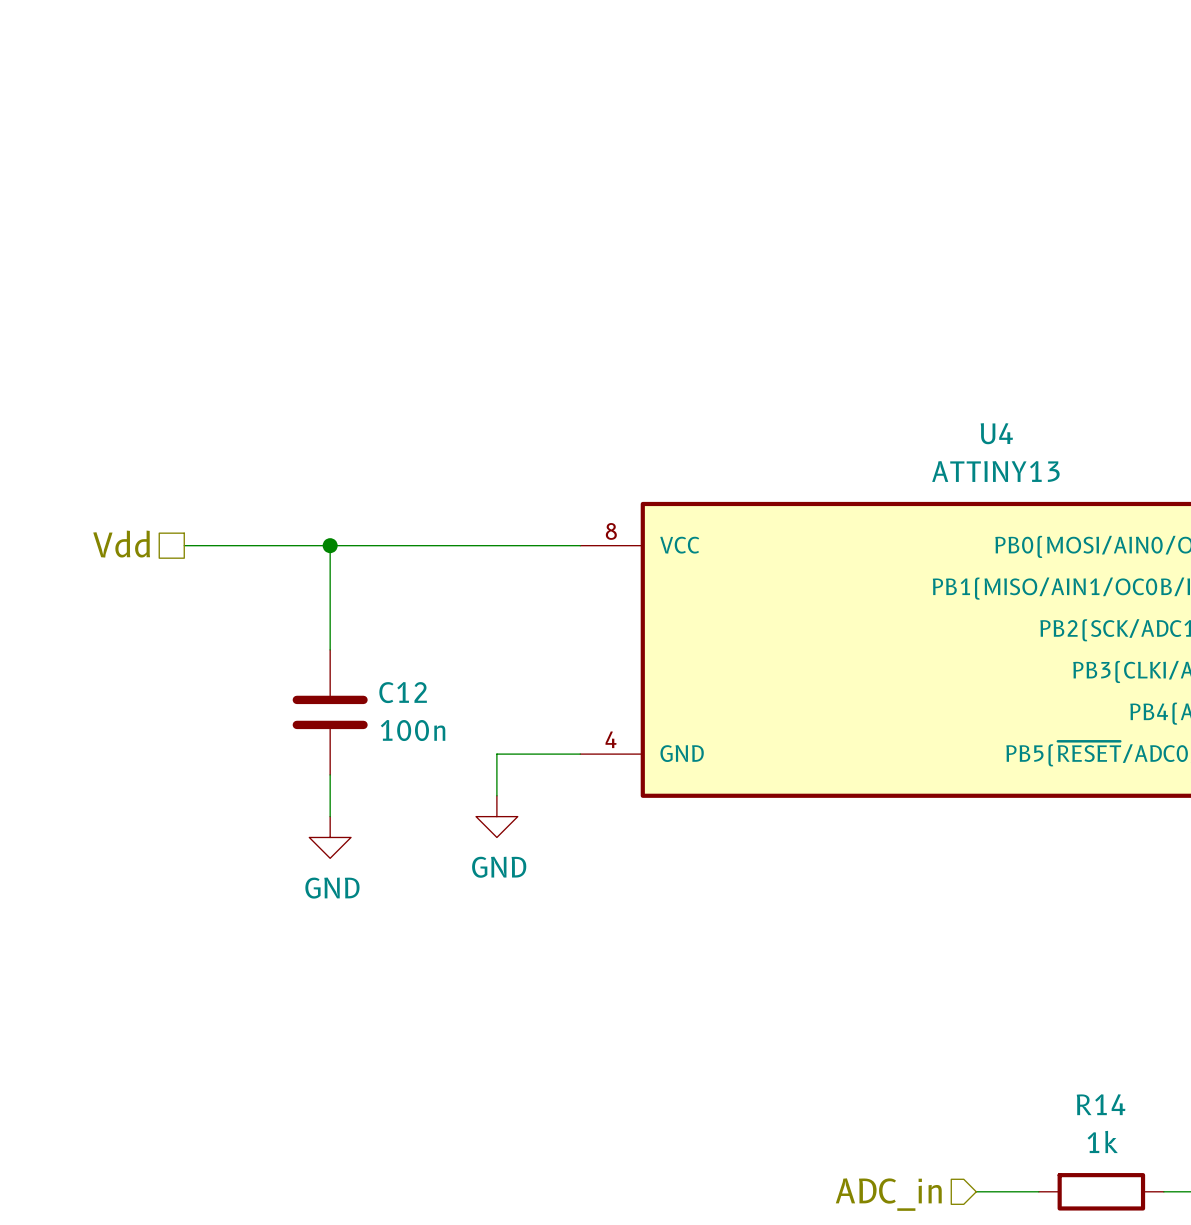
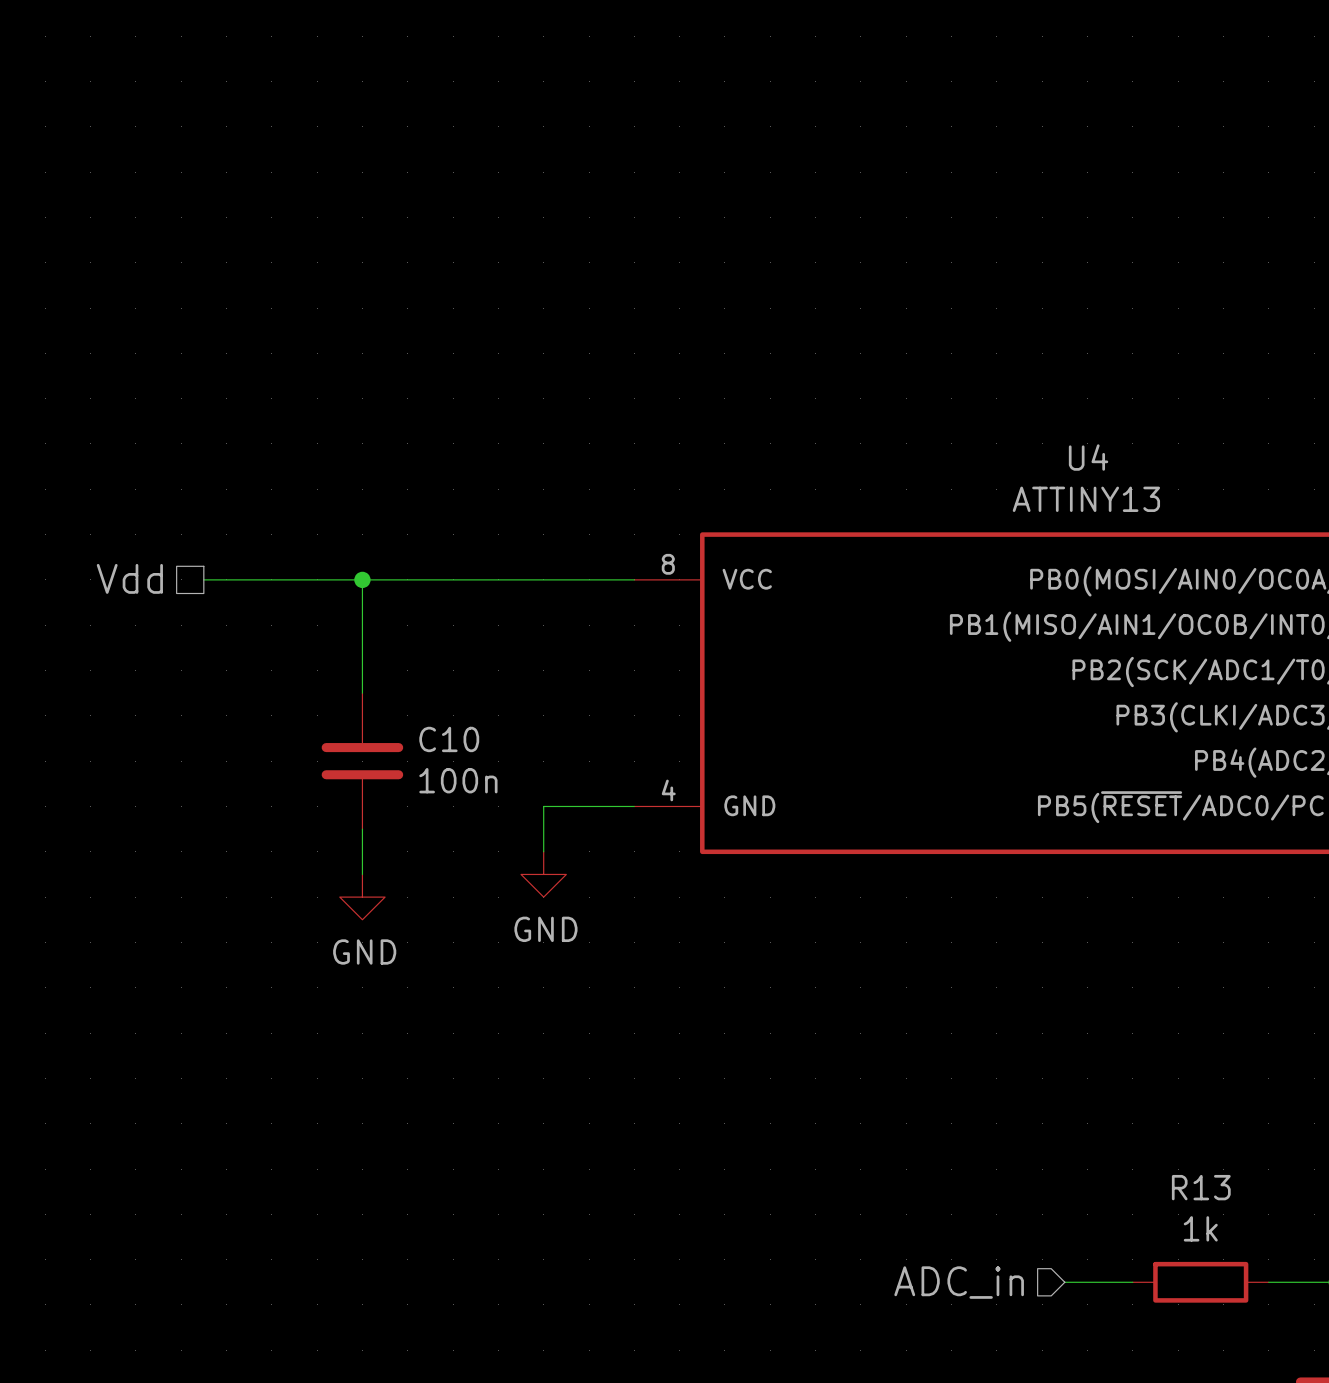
C12 name: C12 (403, 692) -> C10 (449, 739)
R14 name: R14 (1101, 1104) -> R13 (1201, 1187)

